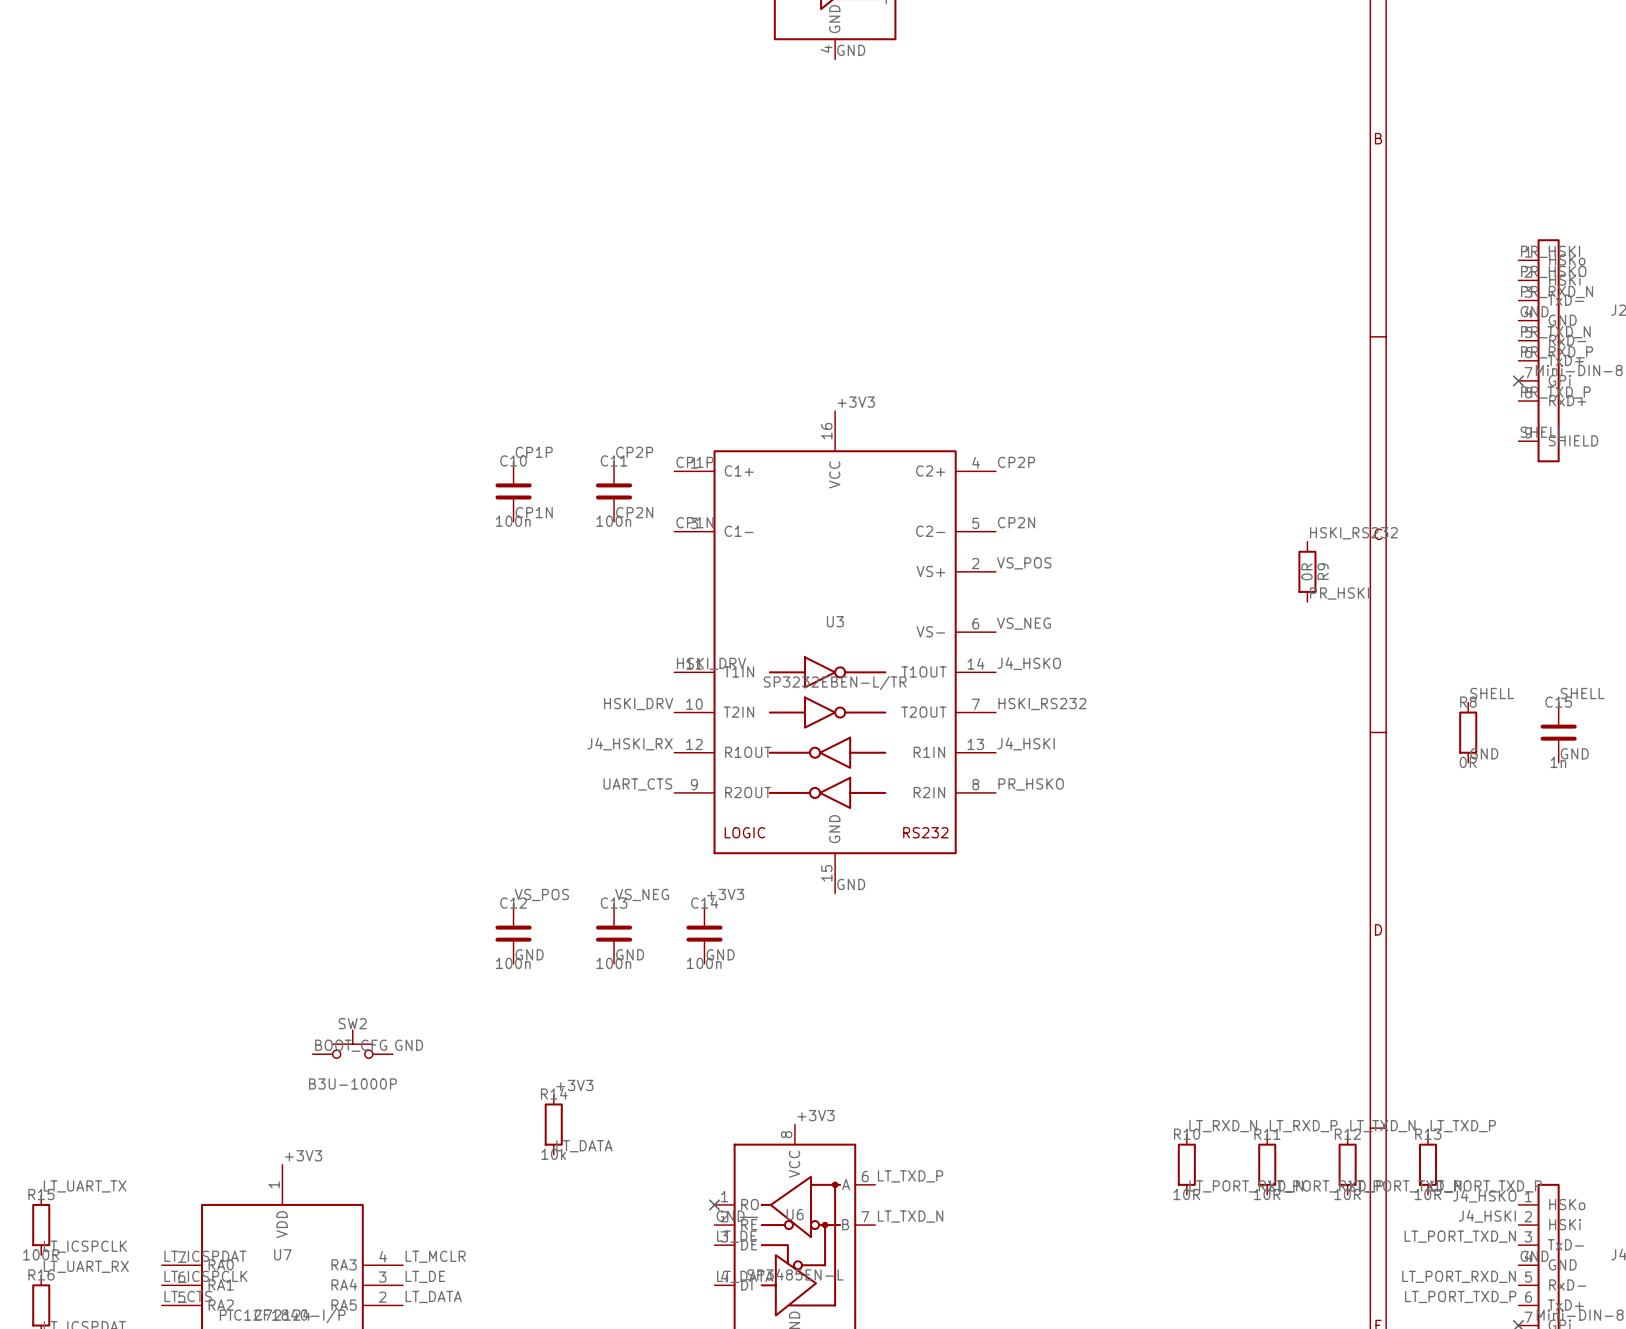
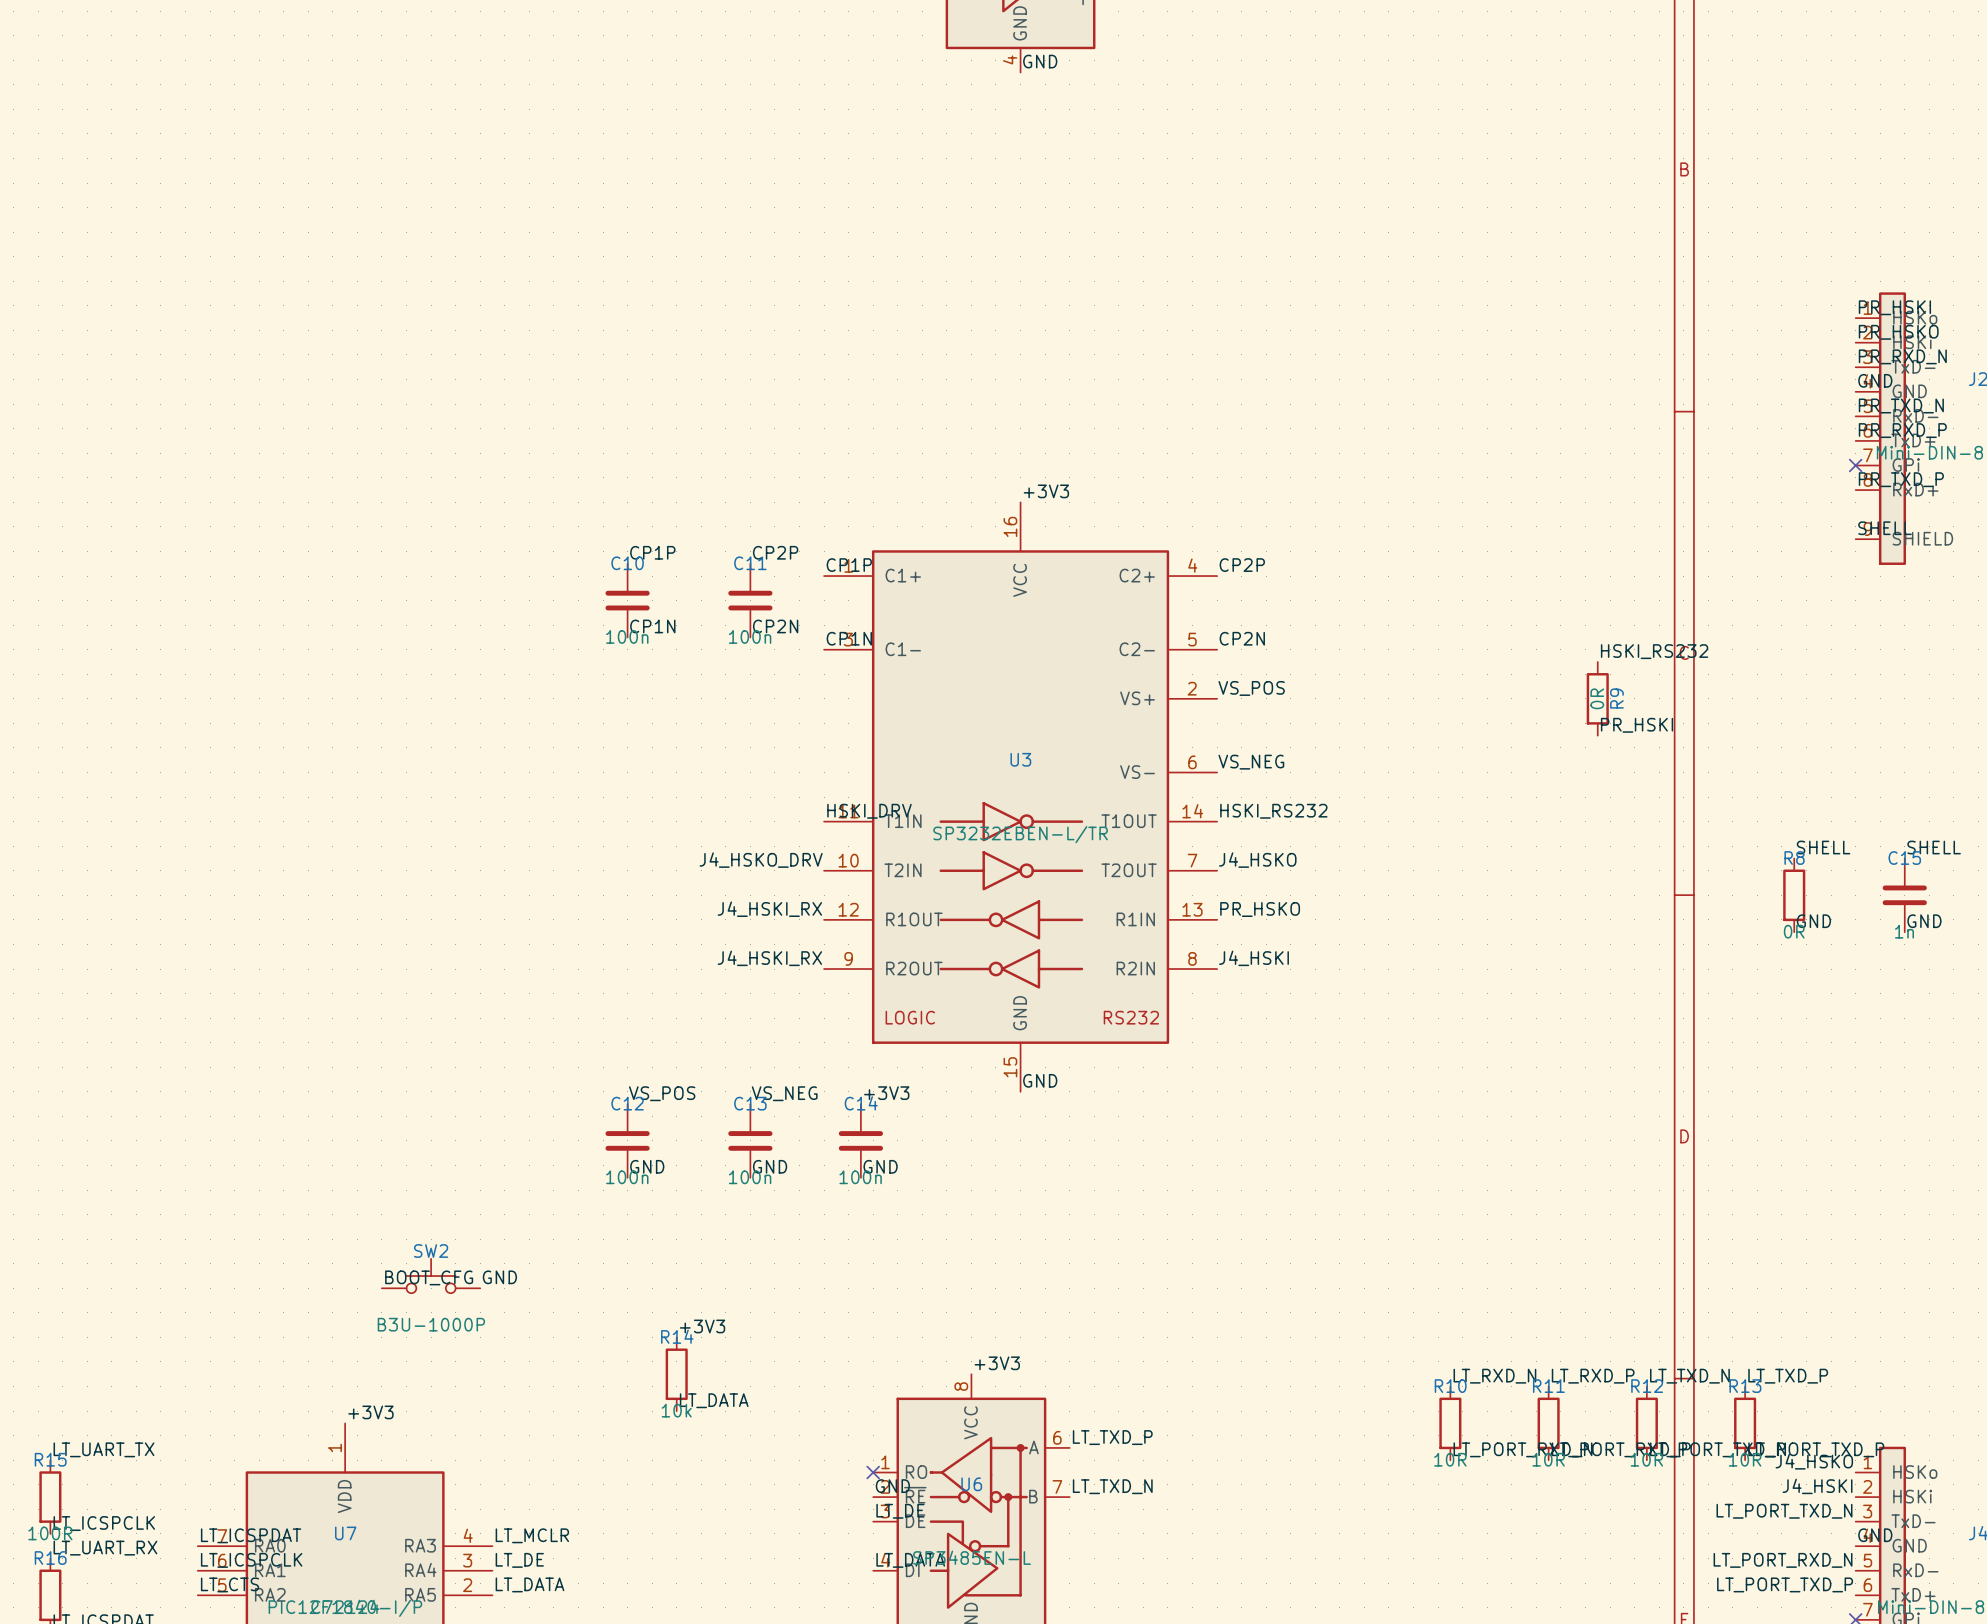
label: J4_HSKO (1029, 663) -> HSKI_RS232 (1273, 811)
label: HSKI_DRV (638, 704) -> J4_HSKO_DRV (761, 860)
label: HSKI_RS232 (1042, 704) -> J4_HSKO (1257, 860)
label: J4_HSKI (1026, 744) -> PR_HSKO (1260, 909)
label: UART_CTS (637, 784) -> J4_HSKI_RX (769, 958)
label: PR_HSKO (1031, 784) -> J4_HSKI (1253, 958)

